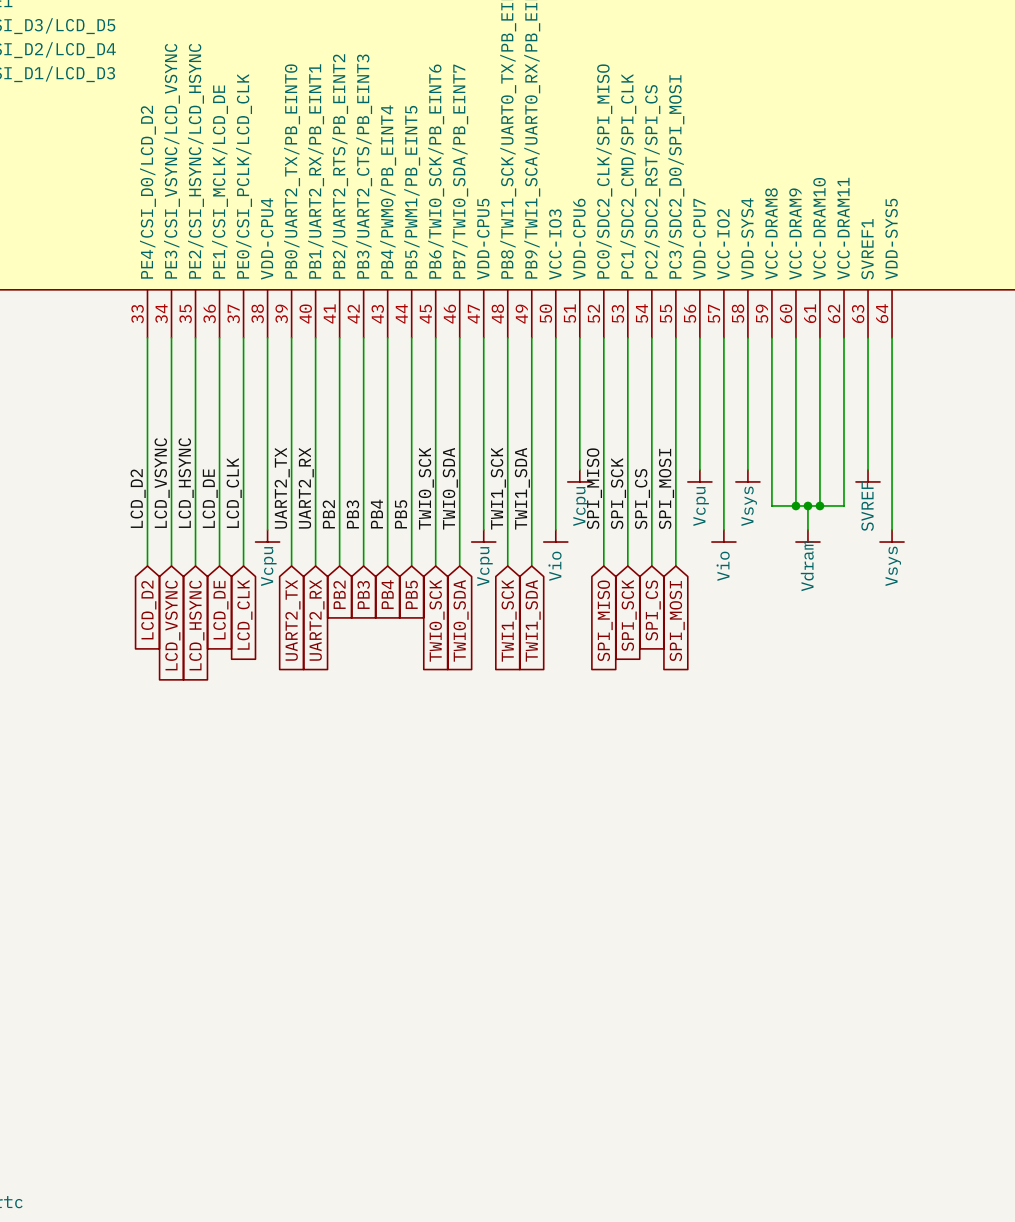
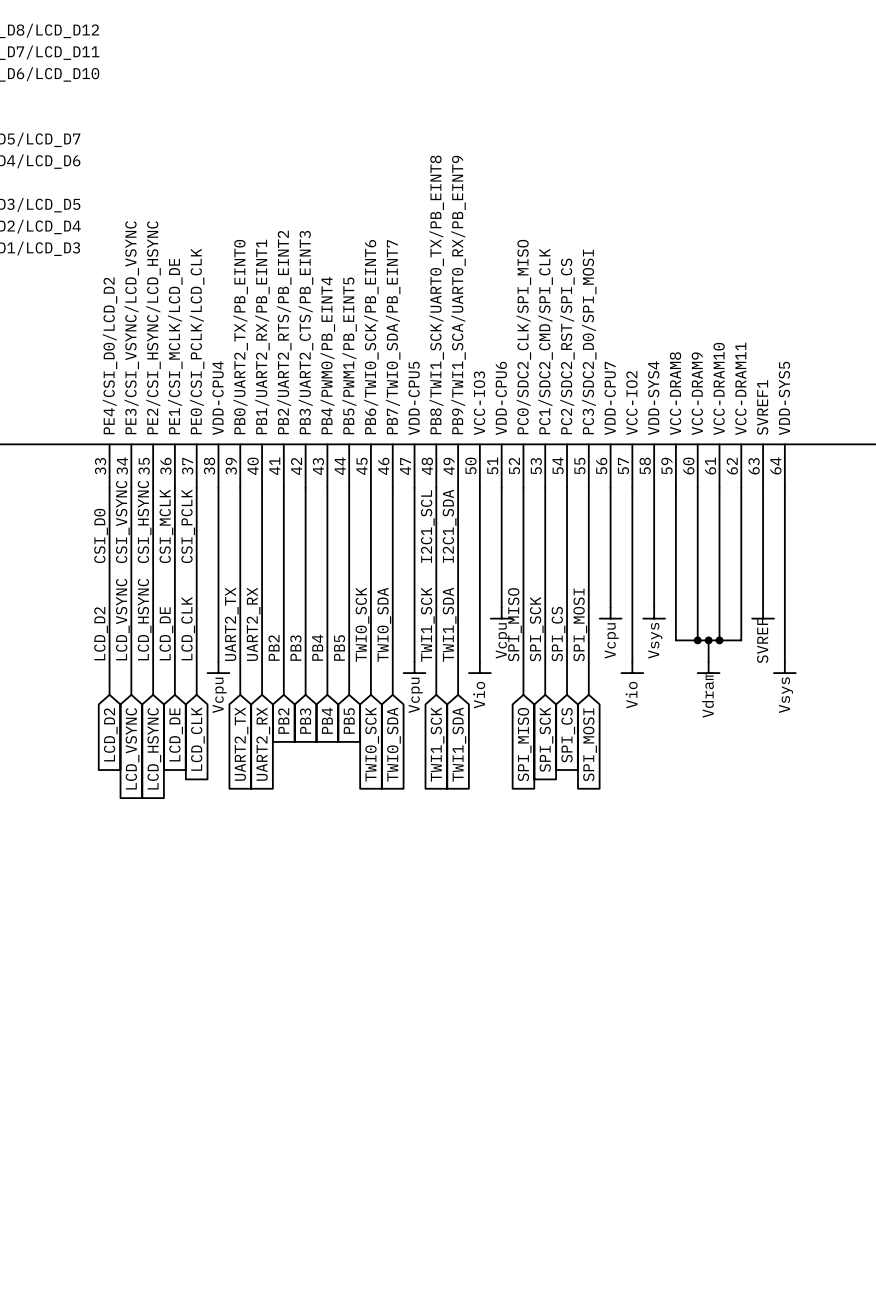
label: none -> CSI_VSYNC (122, 521)
label: none -> CSI_HSYNC (144, 521)
label: none -> CSI_MCLK (166, 526)
label: none -> CSI_PCLK (188, 526)
label: none -> I2C1_SCL (427, 526)
label: none -> I2C1_SDA (449, 526)
label: none -> CSI_D0 (101, 535)

